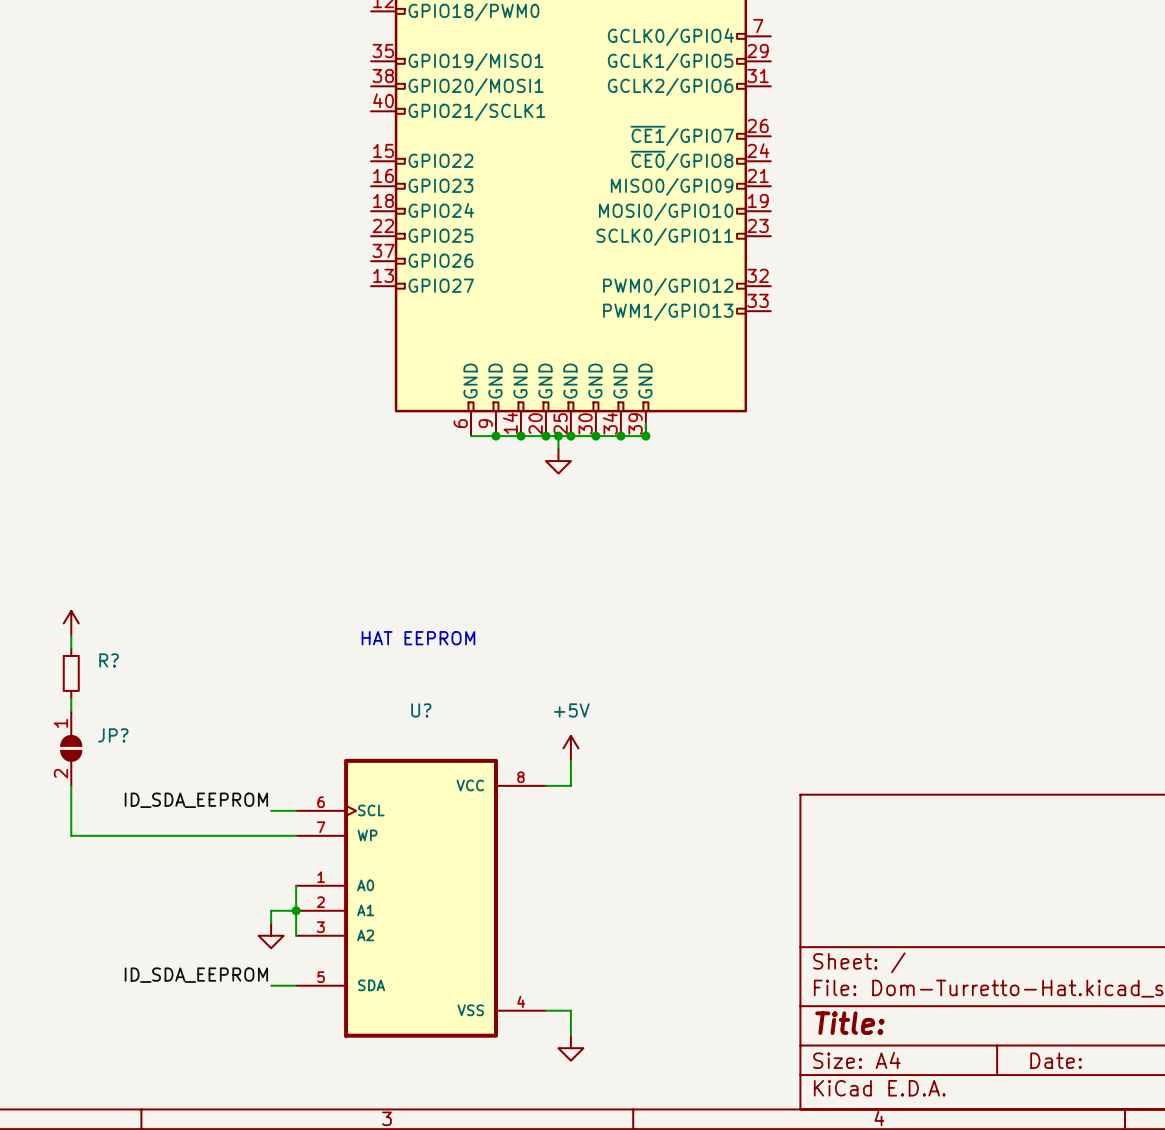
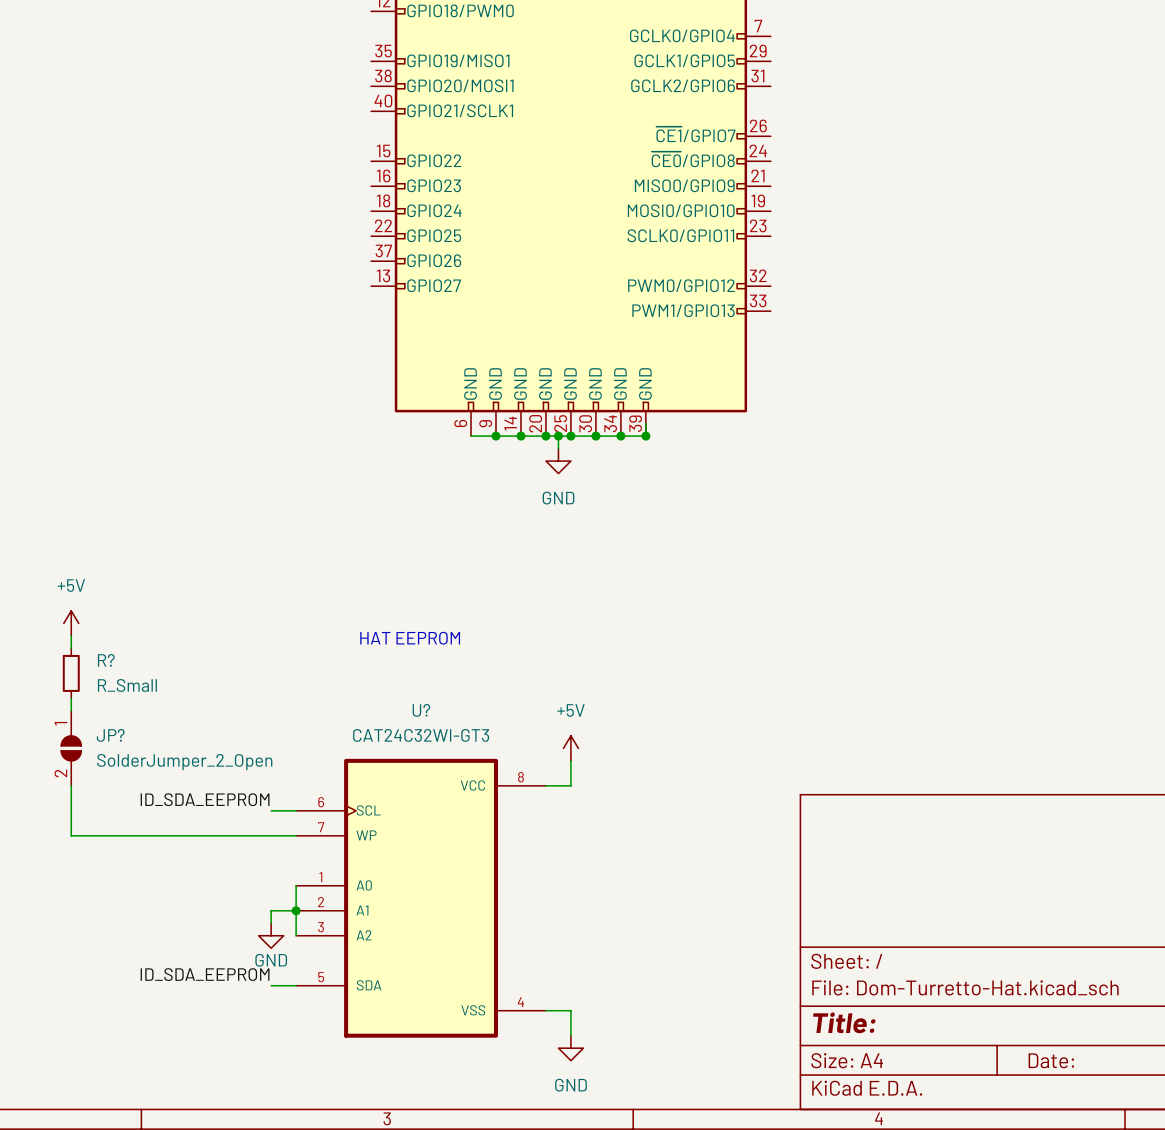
power symbol text: none -> GND (558, 498)
power symbol text: none -> +5V (71, 585)
R? value: none -> R_Small (127, 685)
U? value: none -> CAT24C32WI-GT3 (421, 735)
JP? value: none -> SolderJumper_2_Open (184, 762)
power symbol text: none -> GND (271, 960)
power symbol text: none -> GND (571, 1085)

